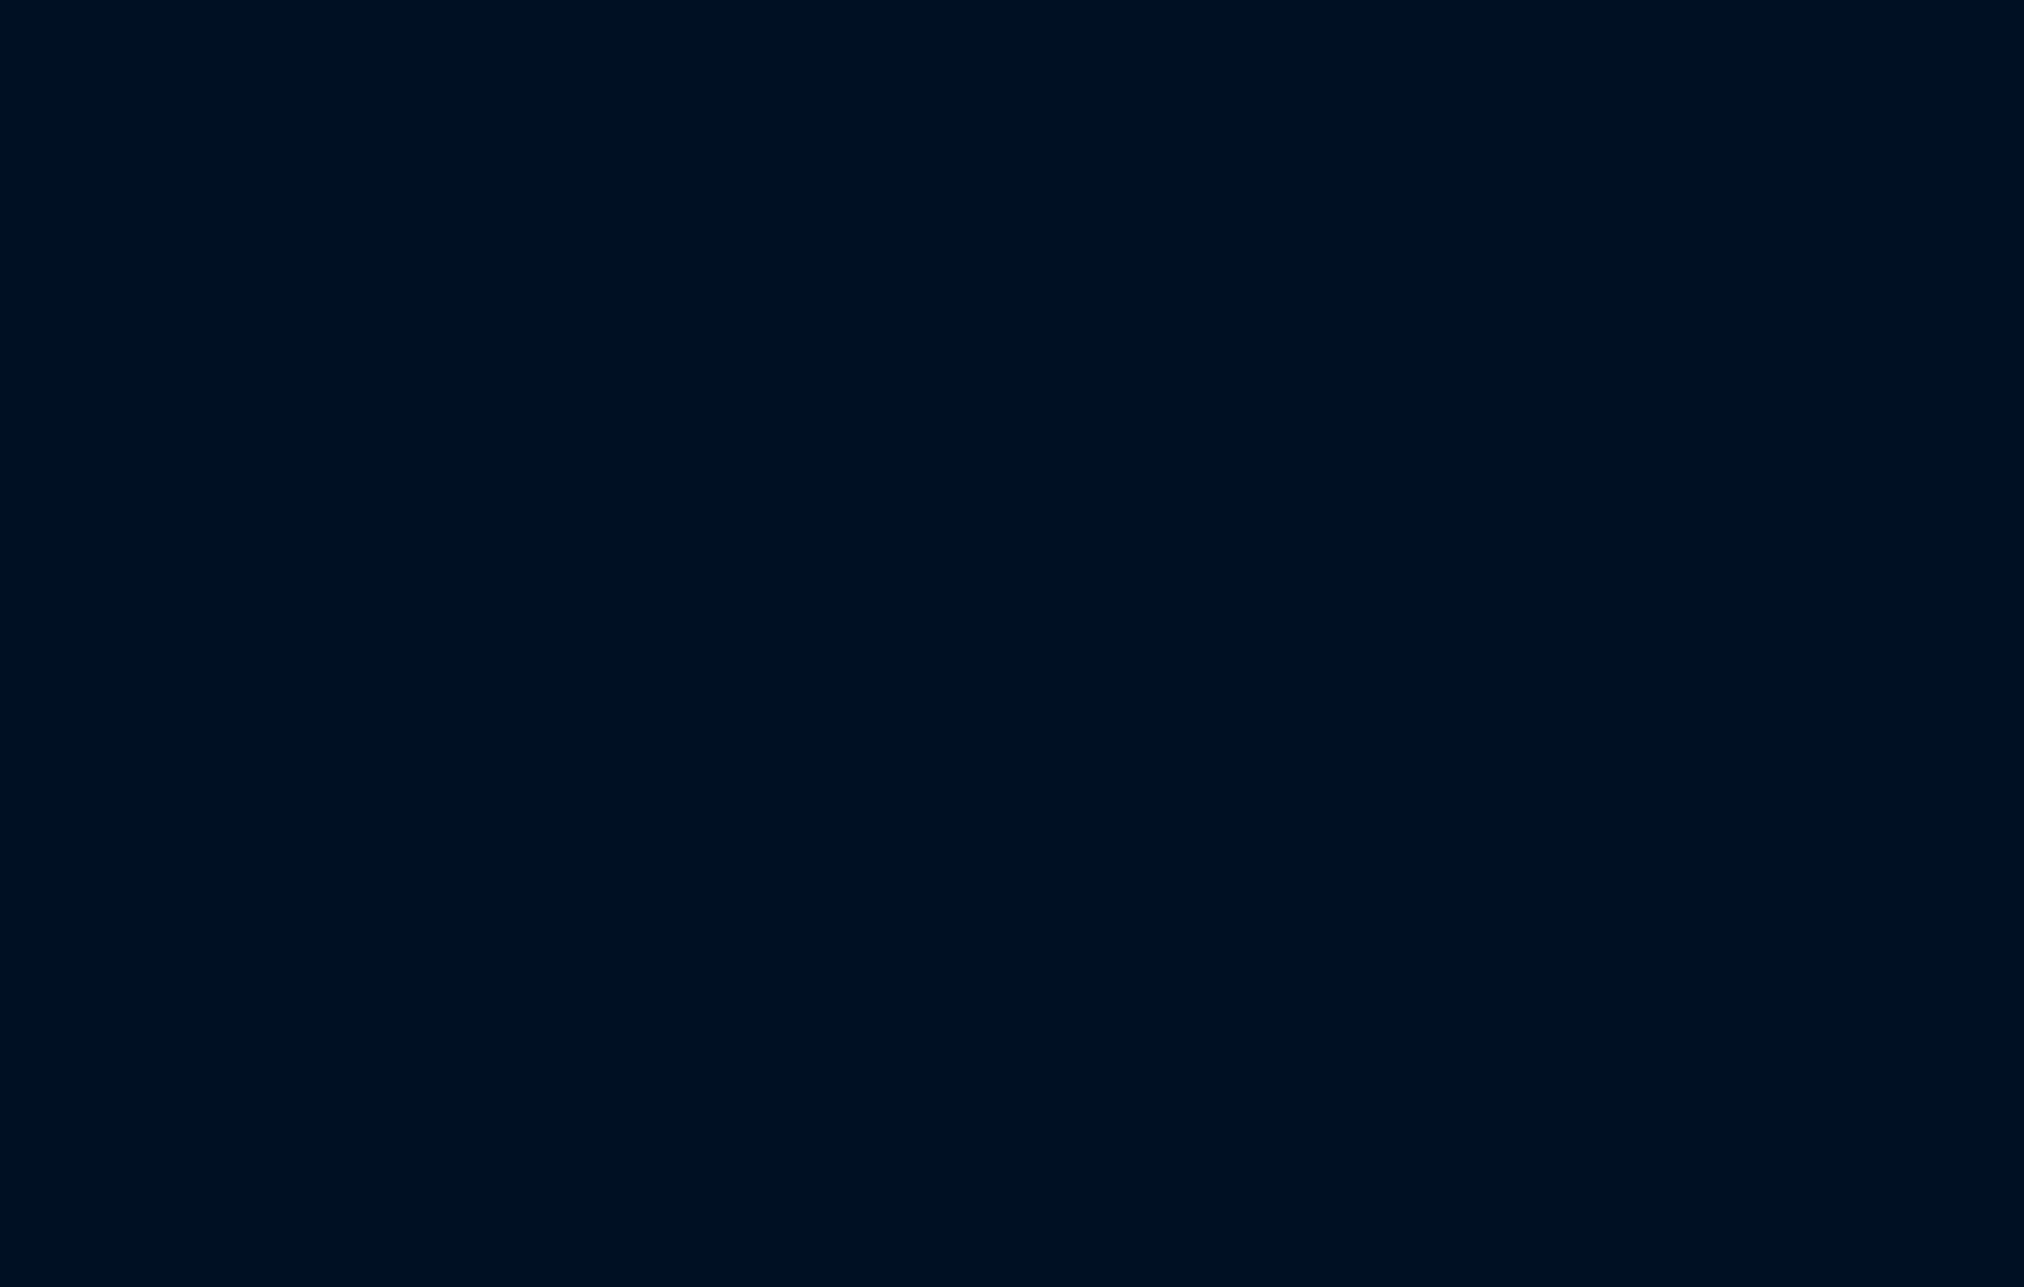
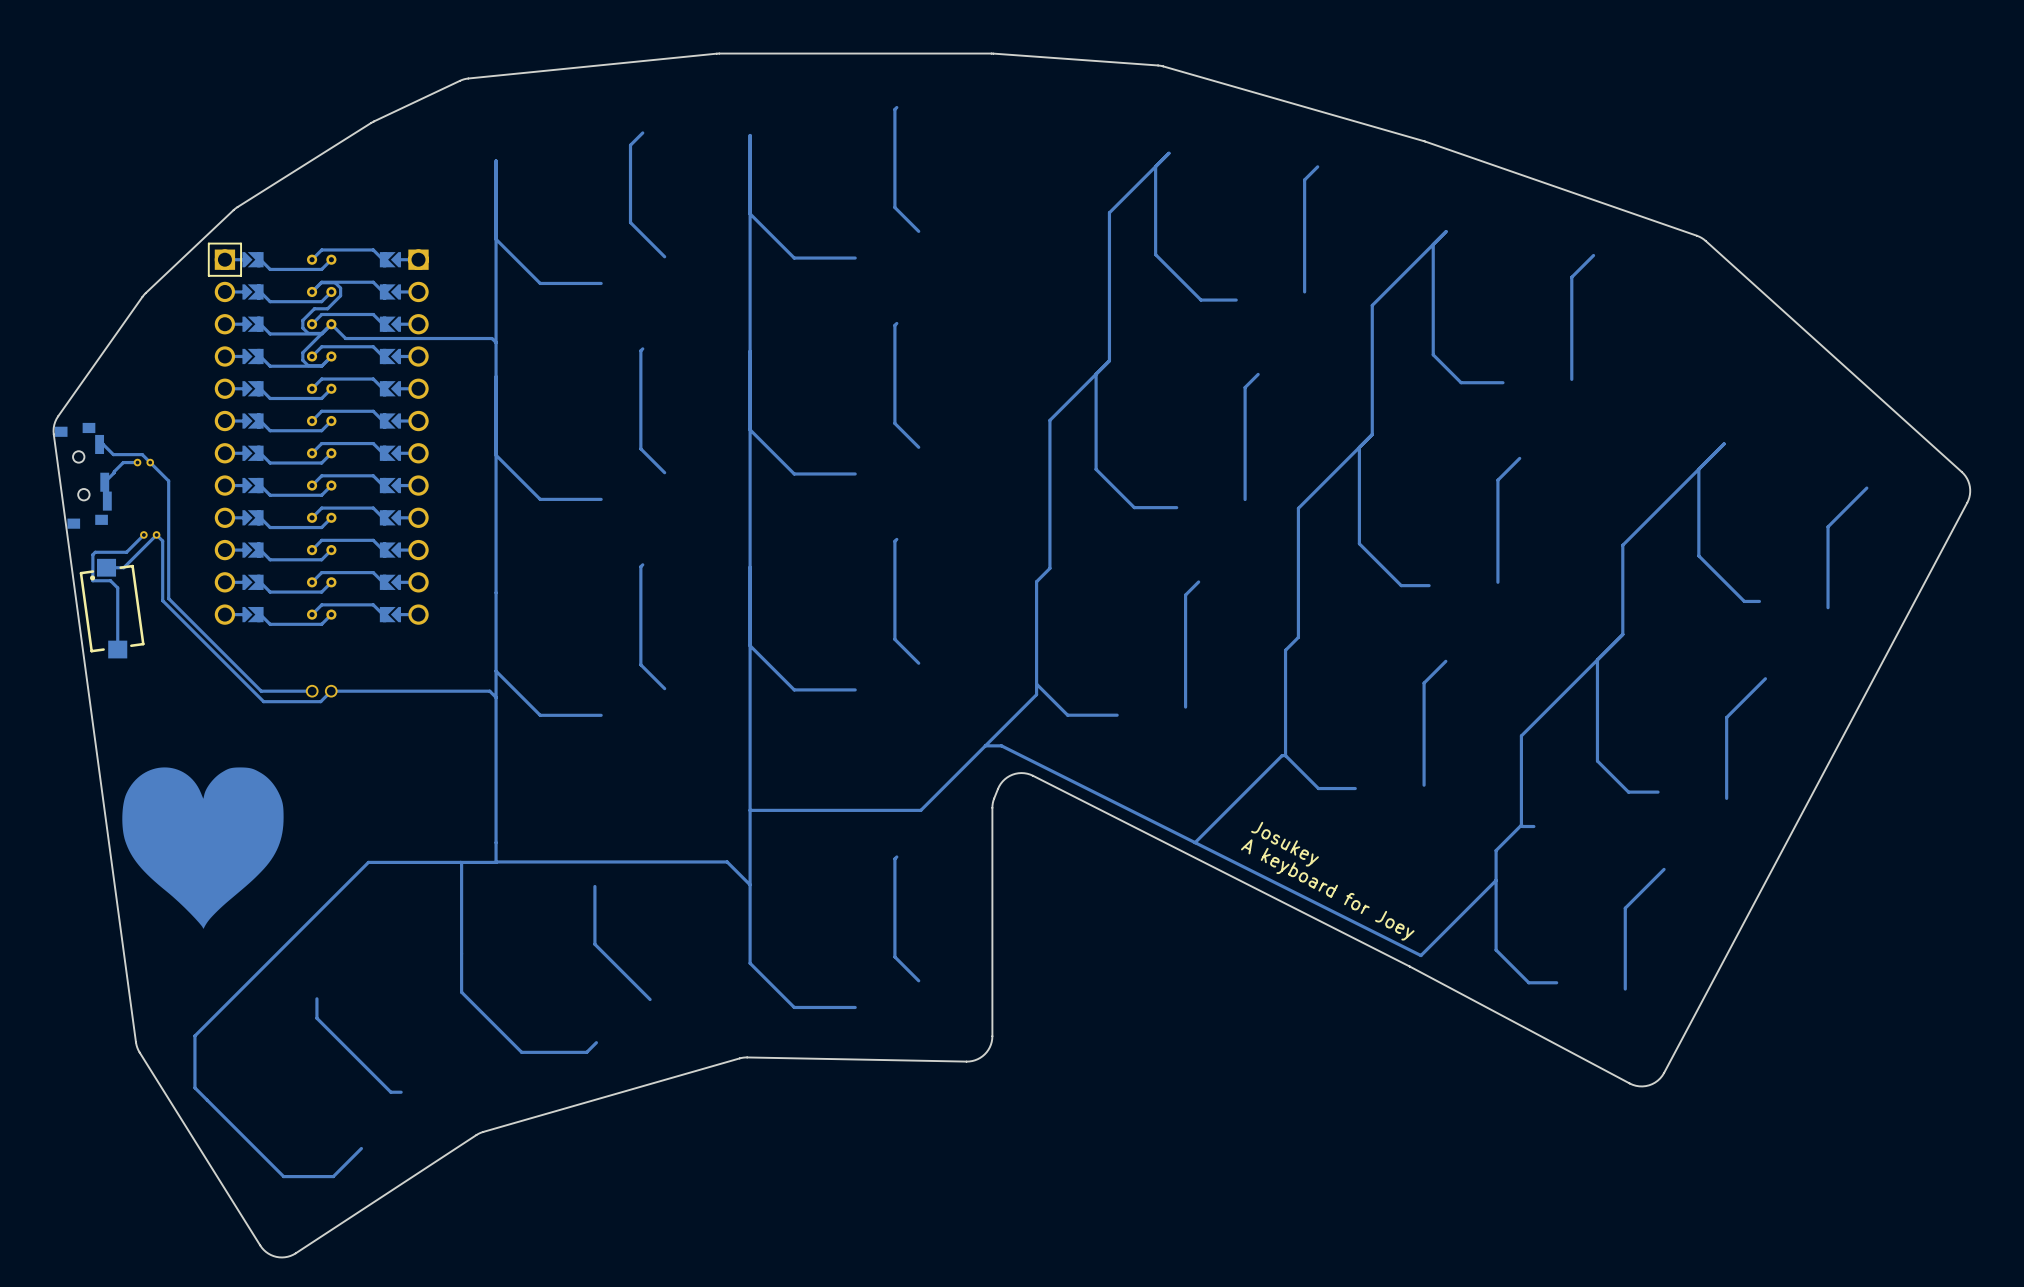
board edge: none -> (993, 53) (1163, 66) (1424, 141) (1699, 236) (1965, 476) (1970, 489) (1967, 502) (1664, 1072) (1657, 1080) (1649, 1085) (1639, 1086) (1629, 1083) (1409, 966) (1033, 775) (1018, 773) (1009, 775) (1002, 781) (992, 805) (992, 1036) (988, 1049) (980, 1057) (966, 1061) (739, 1058) (479, 1133) (293, 1254) (282, 1257) (268, 1253) (260, 1245) (136, 1045) (53, 434) (56, 418) (143, 294) (235, 208) (372, 122) (462, 79) (718, 53) (993, 53)
track: none -> (896, 107) (894, 109) (894, 207) (918, 231)
track: none -> (642, 132) (630, 145) (630, 222) (664, 256)
track: none -> (750, 135) (750, 963) (794, 1007) (855, 1007)
track: none -> (1168, 153) (1109, 212) (1109, 360) (1049, 420) (1049, 568) (1036, 581) (1036, 694) (920, 810) (750, 810)
track: none -> (496, 160) (496, 862)
track: none -> (1155, 166) (1155, 254) (1201, 300) (1236, 300)
track: none -> (1317, 166) (1304, 179) (1304, 291)
track: none -> (750, 213) (794, 258) (855, 258)
track: none -> (1446, 231) (1372, 305) (1372, 434) (1298, 508) (1298, 637) (1285, 650) (1285, 755)
track: none -> (496, 239) (540, 283) (601, 283)
track: none -> (1433, 244) (1433, 354) (1461, 382) (1502, 382)
track: none -> (1593, 255) (1571, 277) (1571, 379)
track: none -> (312, 291) (321, 282) (335, 282) (340, 288) (340, 295) (327, 308) (314, 308) (302, 320) (302, 328) (308, 333) (322, 333) (331, 324) (345, 338) (492, 338) (496, 342)
track: none -> (896, 323) (894, 325) (894, 423) (918, 447)
track: none -> (331, 324) (302, 352) (302, 360) (308, 365) (322, 365) (331, 356)
track: none -> (642, 348) (640, 350) (640, 448) (664, 472)
track: none -> (1096, 374) (1096, 469) (1134, 507) (1176, 507)
track: none -> (1258, 374) (1245, 387) (1245, 499)
track: none -> (750, 429) (794, 473) (855, 473)
part: none -> (318, 434)
track: none -> (1724, 443) (1622, 545) (1622, 634) (1521, 735) (1521, 825)
track: none -> (99, 444) (103, 444) (113, 454) (142, 454) (168, 481) (168, 598) (261, 691) (312, 691)
track: none -> (1359, 447) (1359, 543) (1401, 585) (1429, 585)
track: none -> (496, 455) (540, 499) (601, 499)
track: none -> (1519, 458) (1497, 480) (1497, 582)
track: none -> (137, 462) (123, 462) (104, 482)
part: none -> (137, 462)
part: none -> (150, 462)
track: none -> (1698, 469) (1698, 555) (1744, 601) (1759, 601)
part: none -> (83, 475)
track: none -> (1866, 488) (1828, 526) (1828, 607)
track: none -> (143, 534) (126, 552) (95, 552) (92, 554) (92, 580) (110, 580) (117, 587) (117, 649)
part: none -> (143, 534)
part: none -> (156, 534)
track: none -> (896, 539) (894, 541) (894, 639) (918, 663)
track: none -> (642, 564) (640, 566) (640, 664) (664, 688)
track: none -> (106, 567) (123, 567) (156, 534) (162, 541) (162, 600) (263, 701) (320, 701) (331, 691) (489, 691) (496, 697)
track: none -> (1198, 581) (1185, 595) (1185, 707)
part: none -> (112, 608)
track: none -> (750, 645) (794, 689) (855, 689)
track: none -> (1597, 659) (1597, 761) (1628, 792) (1658, 792)
track: none -> (1445, 661) (1424, 683) (1424, 785)
track: none -> (496, 671) (540, 715) (601, 715)
track: none -> (1765, 678) (1726, 717) (1726, 798)
track: none -> (1036, 684) (1067, 715) (1117, 715)
part: none -> (321, 691)
track: none -> (985, 745) (1001, 745) (1420, 955) (1496, 880)
track: none -> (1285, 755) (1282, 755) (1195, 842)
track: none -> (1285, 755) (1318, 788) (1355, 788)
drawing: none -> [122, 767, 284, 929]
track: none -> (1521, 825) (1533, 826)
track: none -> (1521, 825) (1496, 850) (1496, 950) (1528, 982) (1556, 982)
text: none -> Josukey (1285, 844)
track: none -> (896, 856) (894, 858) (894, 956) (918, 980)
track: none -> (460, 862) (461, 992) (521, 1052) (586, 1052) (596, 1042)
track: none -> (496, 862) (368, 862) (194, 1035) (194, 1087) (283, 1176) (333, 1176) (361, 1148)
track: none -> (496, 862) (727, 861) (750, 884)
track: none -> (1664, 869) (1625, 908) (1625, 989)
track: none -> (594, 886) (594, 944) (650, 999)
text: none -> A keyboard for Joey (1327, 889)
track: none -> (316, 998) (316, 1018) (390, 1092) (401, 1092)

